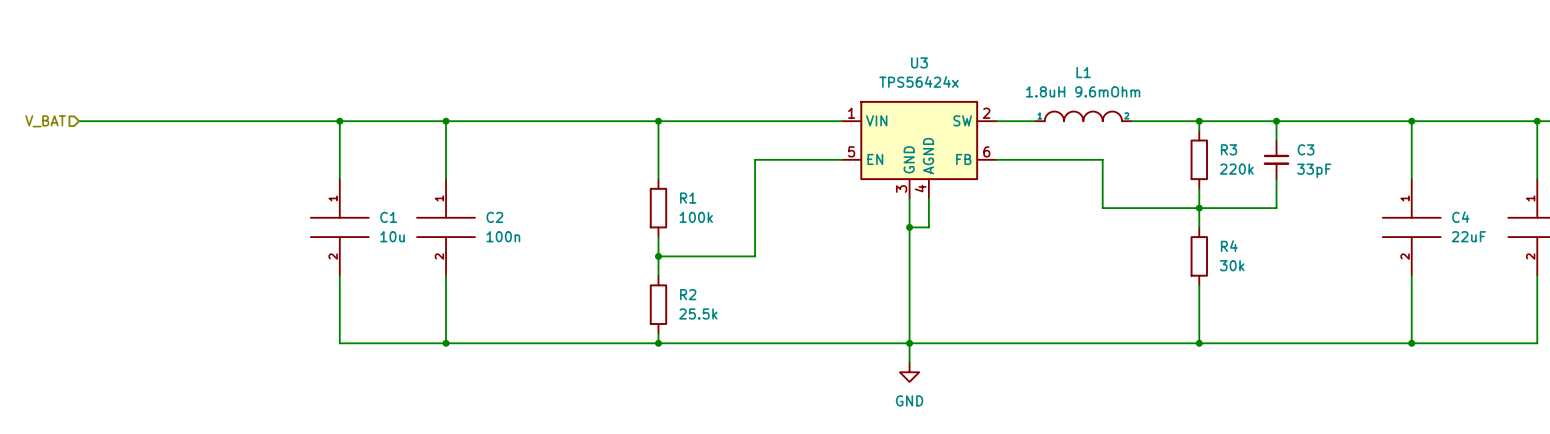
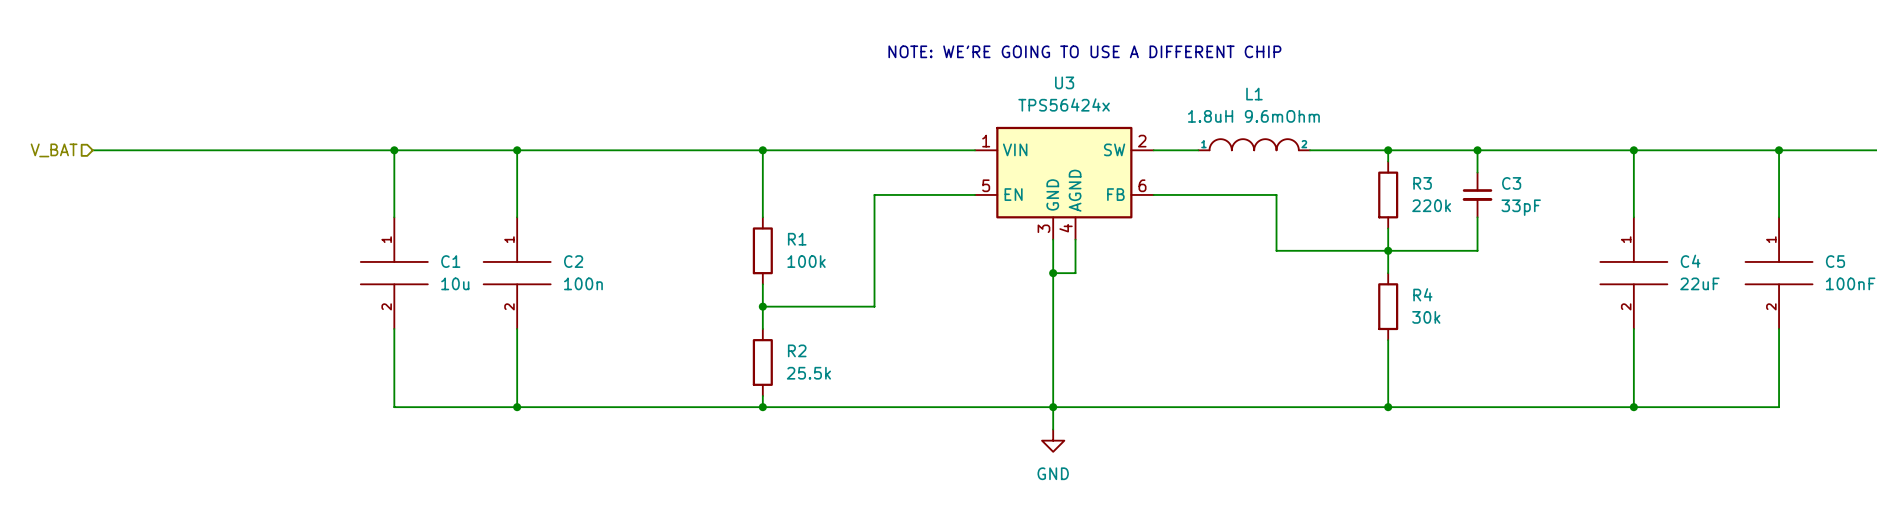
text: none -> NOTE: WE'RE GOING TO USE A DIFFERENT CHIP (1084, 51)

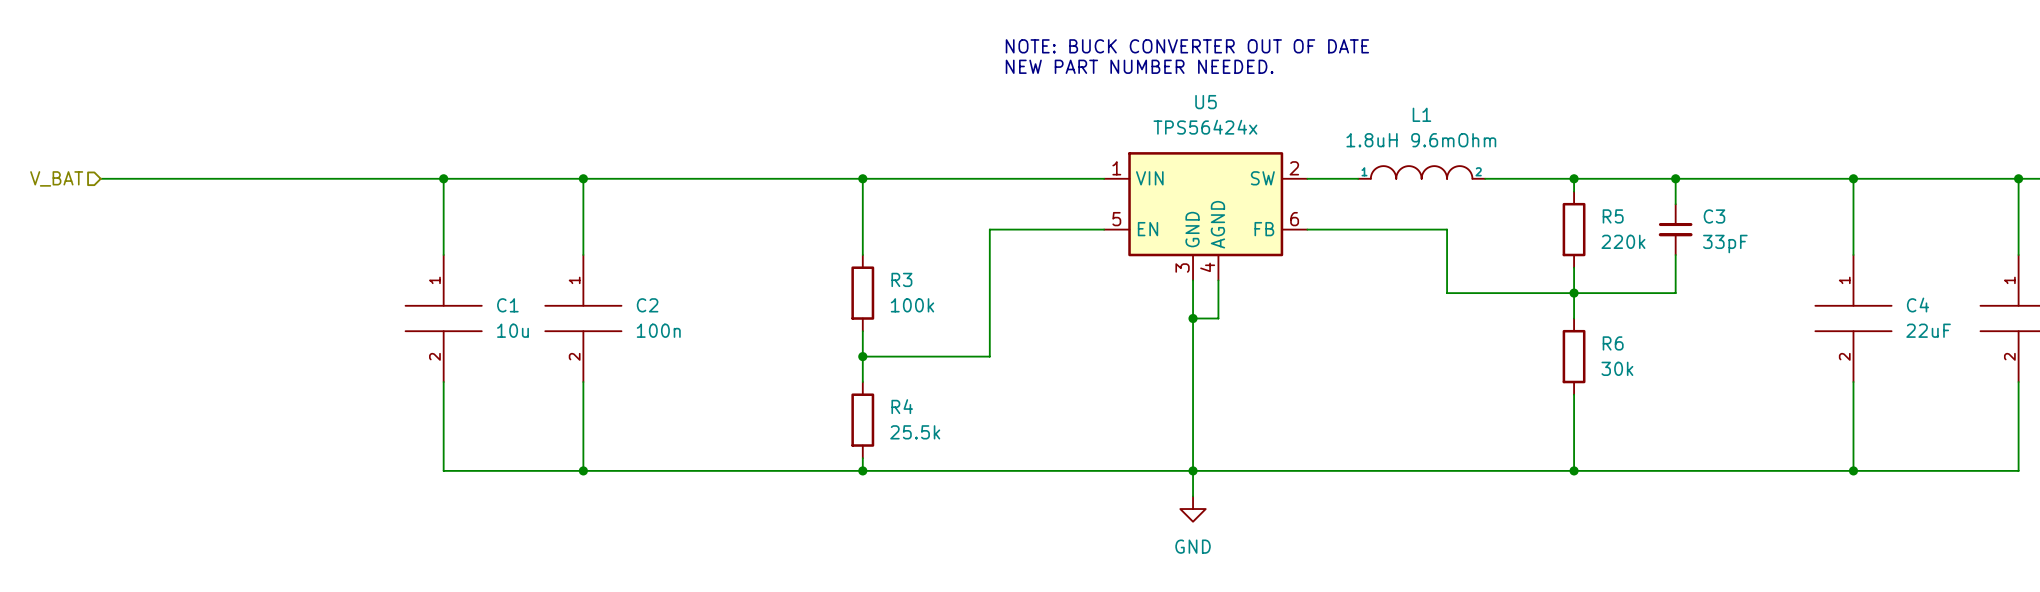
text: none -> NOTE: BUCK CONVERTER OUT OF DATE (1187, 46)
text: NOTE: WE'RE GOING TO USE A DIFFERENT CHIP (1084, 51) -> NEW PART NUMBER NEEDED. (1139, 66)
U3 name: U3 (1064, 82) -> U5 (1206, 102)
R3 name: R3 (1422, 183) -> R5 (1613, 216)
R1 name: R1 (797, 239) -> R3 (901, 279)
R4 name: R4 (1422, 294) -> R6 (1613, 343)
R2 name: R2 (797, 350) -> R4 (902, 406)

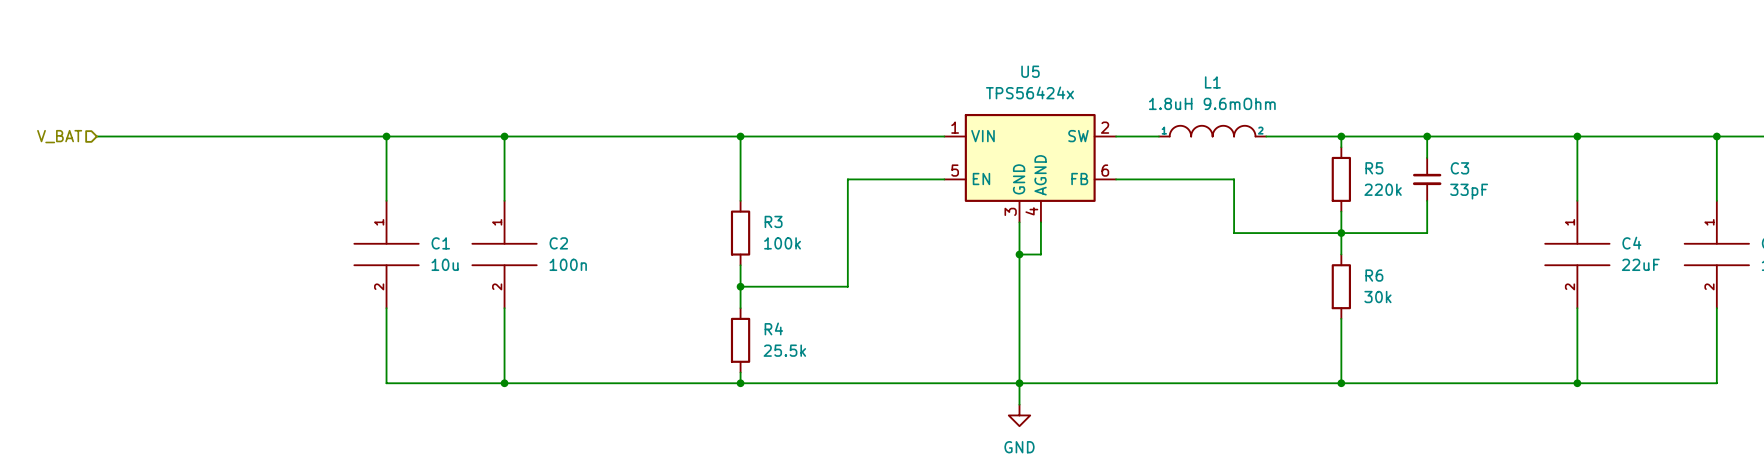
text: NOTE: BUCK CONVERTER OUT OF DATE (1187, 46) -> none
text: NEW PART NUMBER NEEDED. (1139, 66) -> none

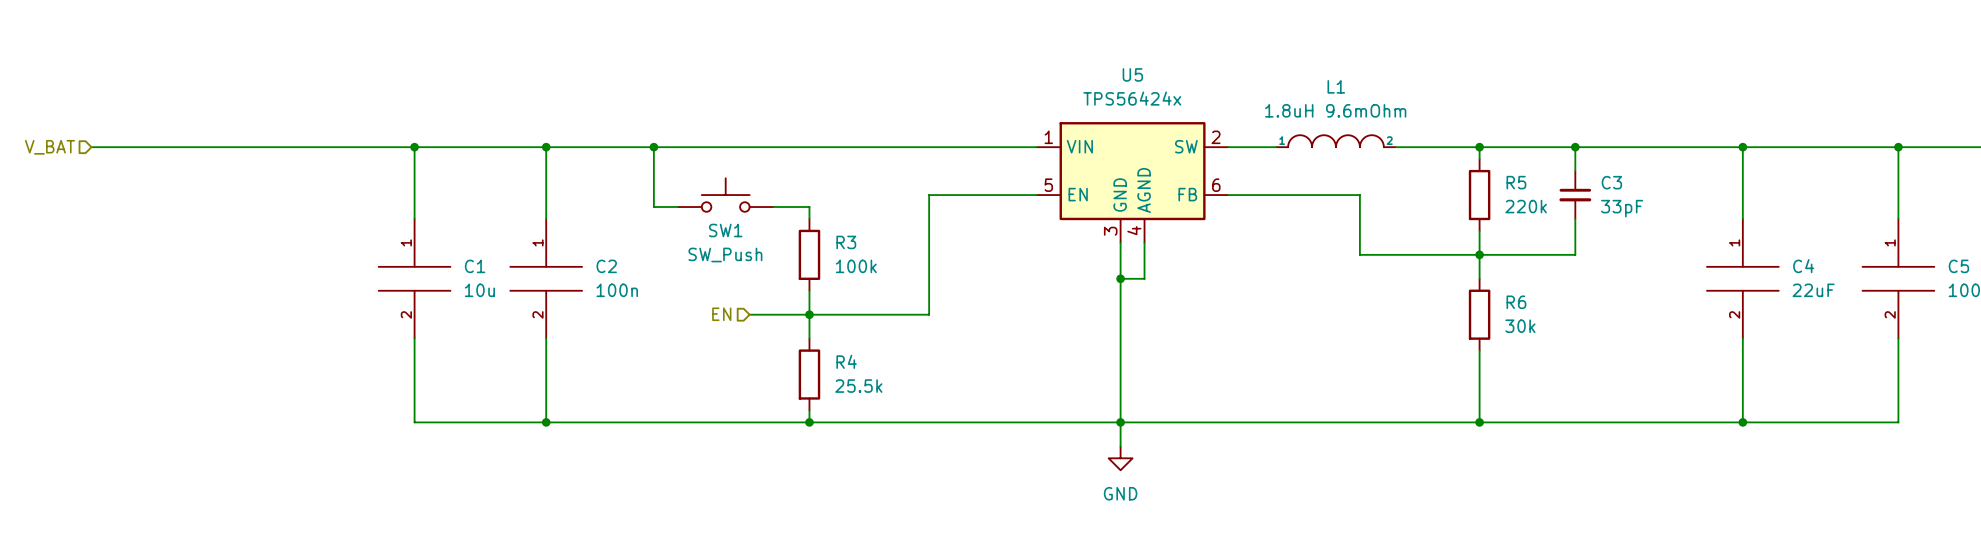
wire: none -> (653, 147) (653, 207) (677, 207)
junction: none -> (653, 147)
wire: (740, 136) (740, 190) -> (773, 207) (809, 207)
junction: (740, 136) -> none
SW1: none -> SW_Push (725, 195)
hierarchical label: none -> EN (721, 314)
wire: none -> (749, 314) (809, 314)

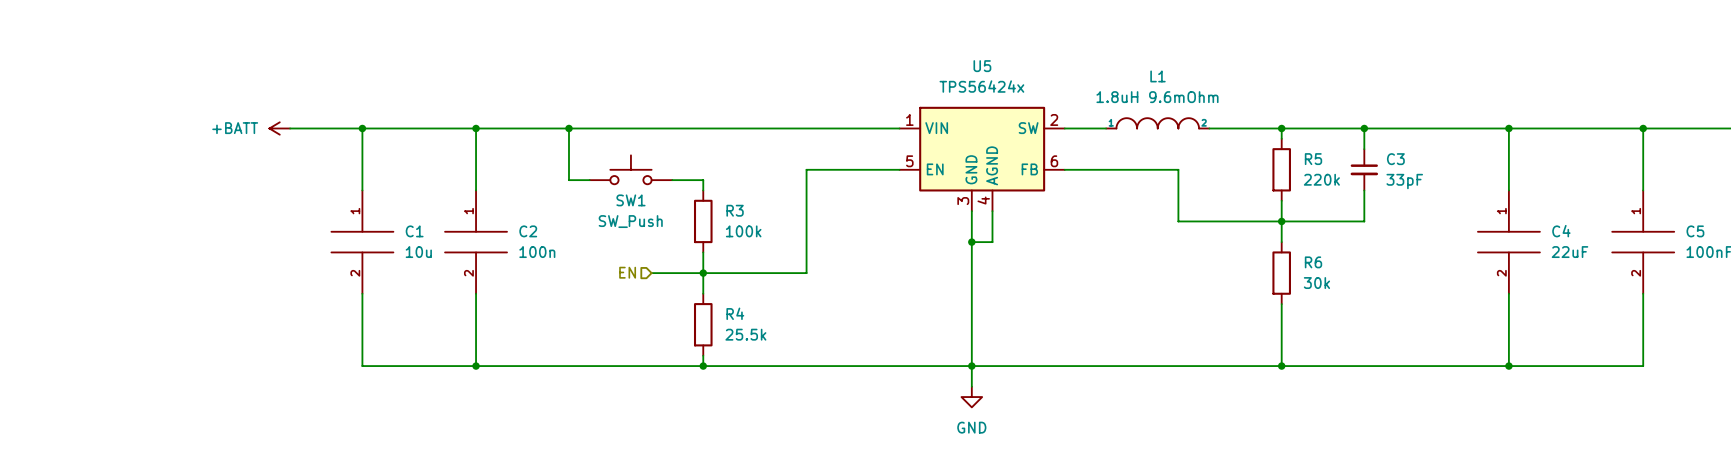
hierarchical label: V_BAT (49, 147) -> none
wire: (91, 147) (330, 147) -> none
power symbol: none -> +BATT (279, 128)

